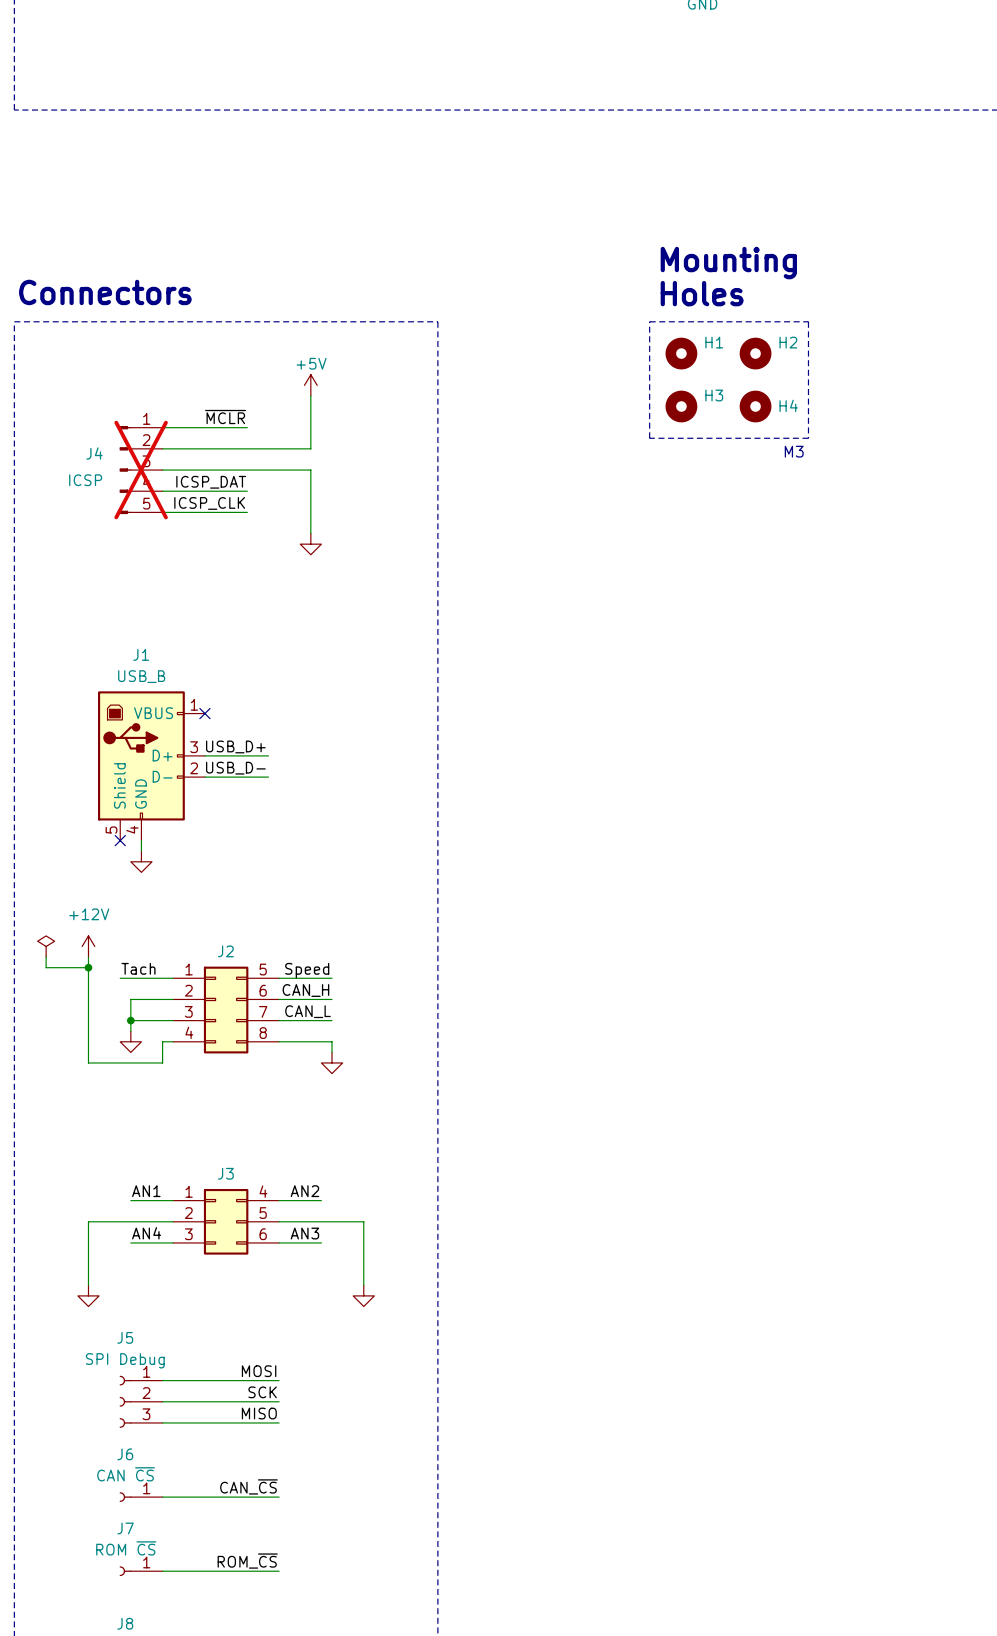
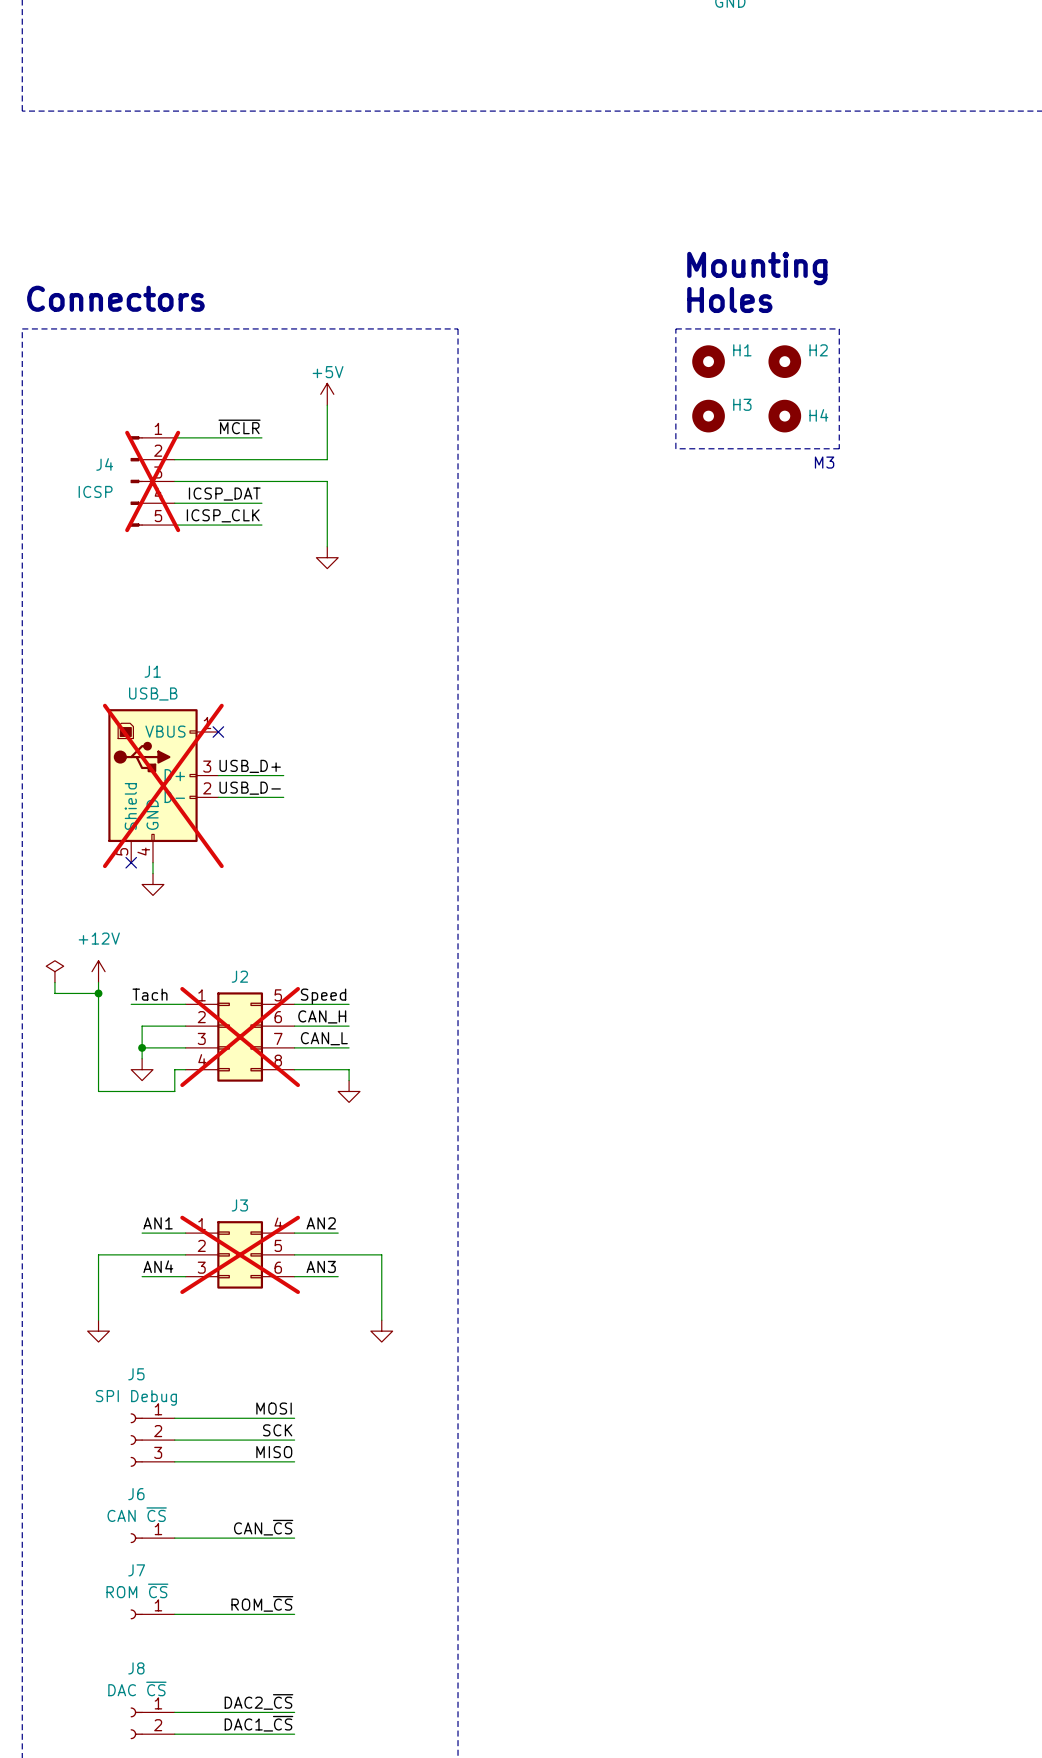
J1 do-not-place cross: none -> (163, 785)
J2 do-not-place cross: none -> (240, 1037)
J3 do-not-place cross: none -> (240, 1254)

